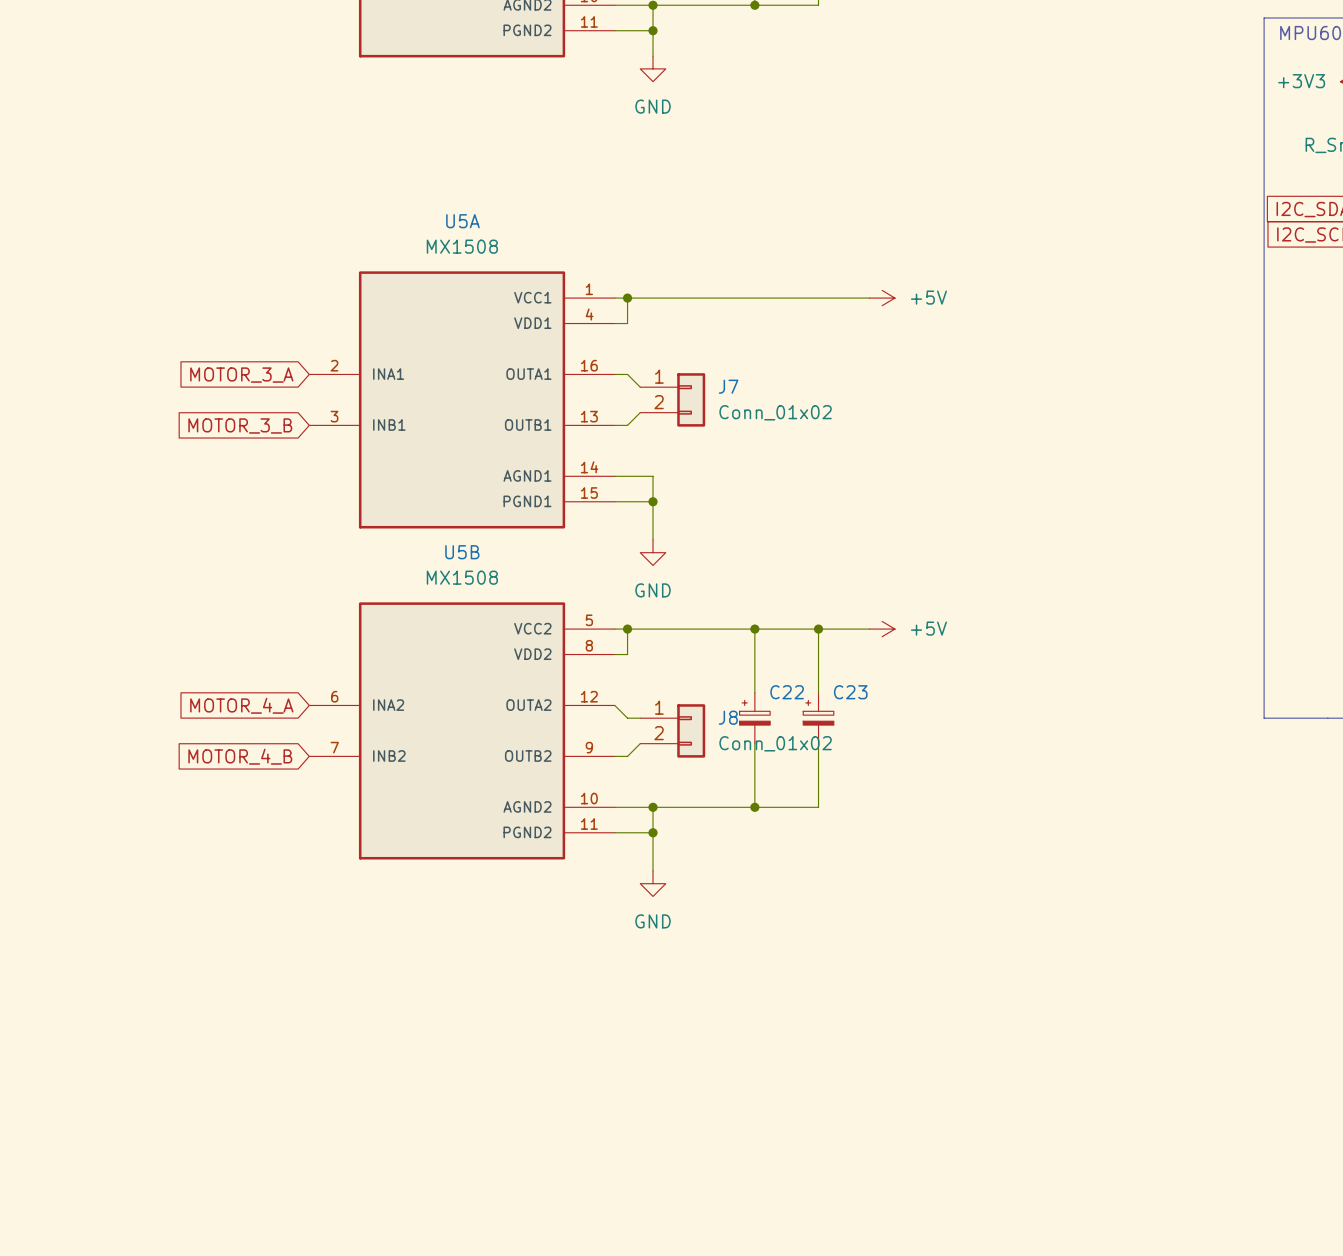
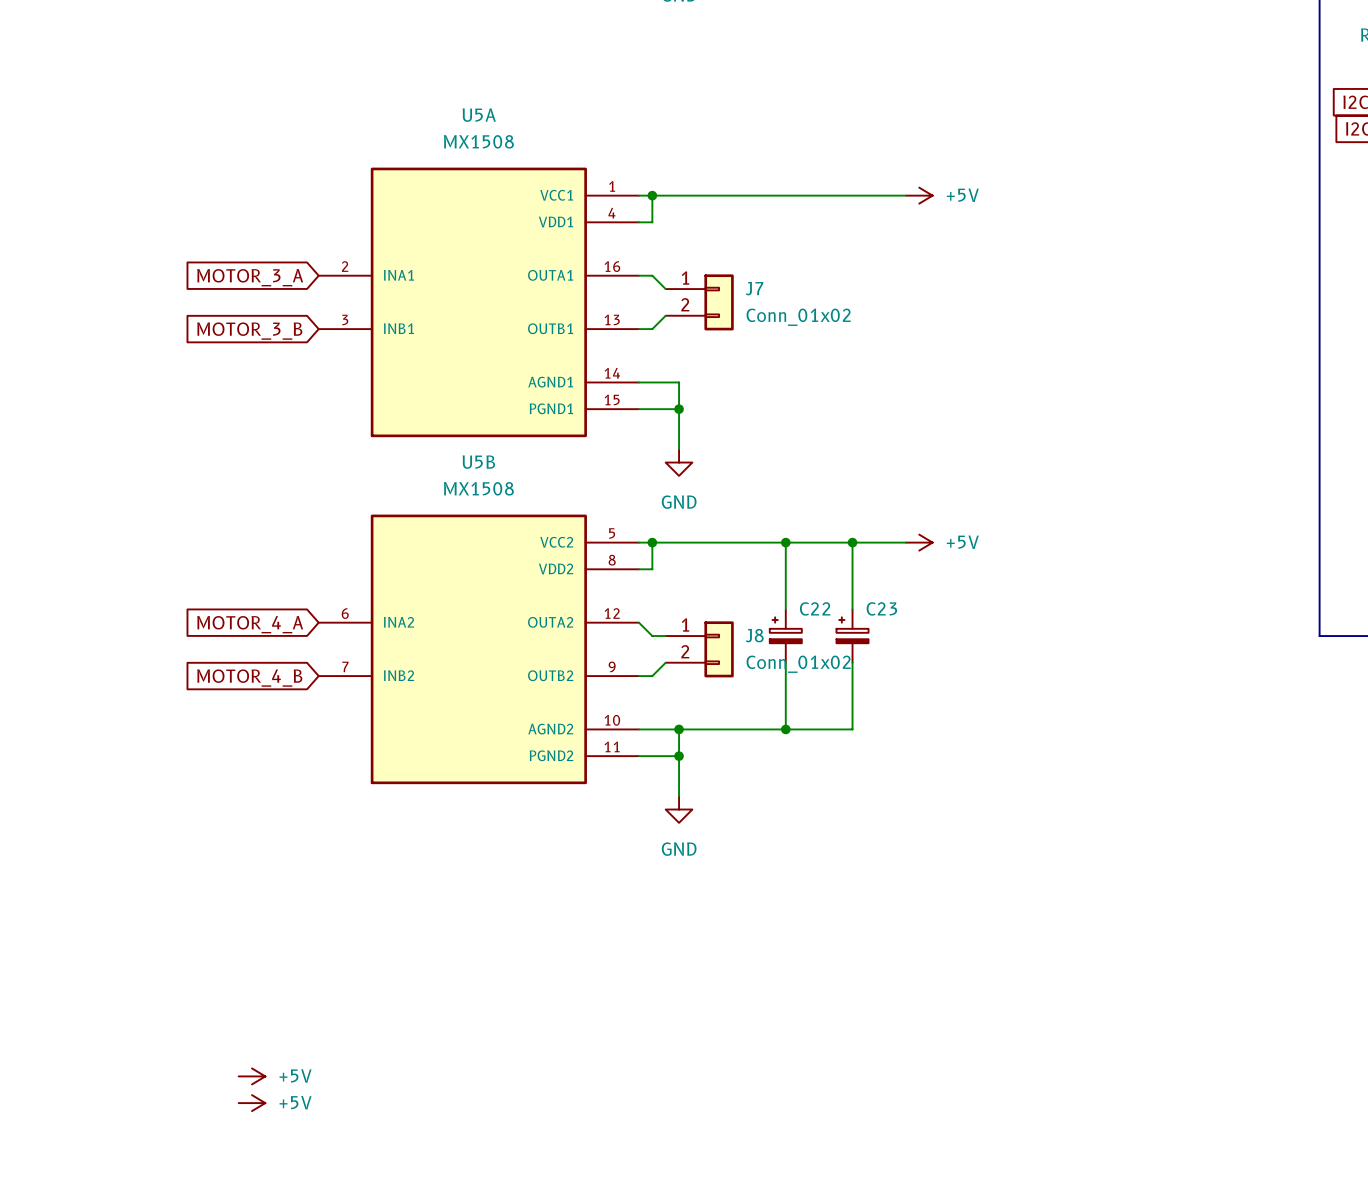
power symbol: none -> +5V (251, 1076)
power symbol: none -> +5V (251, 1103)

